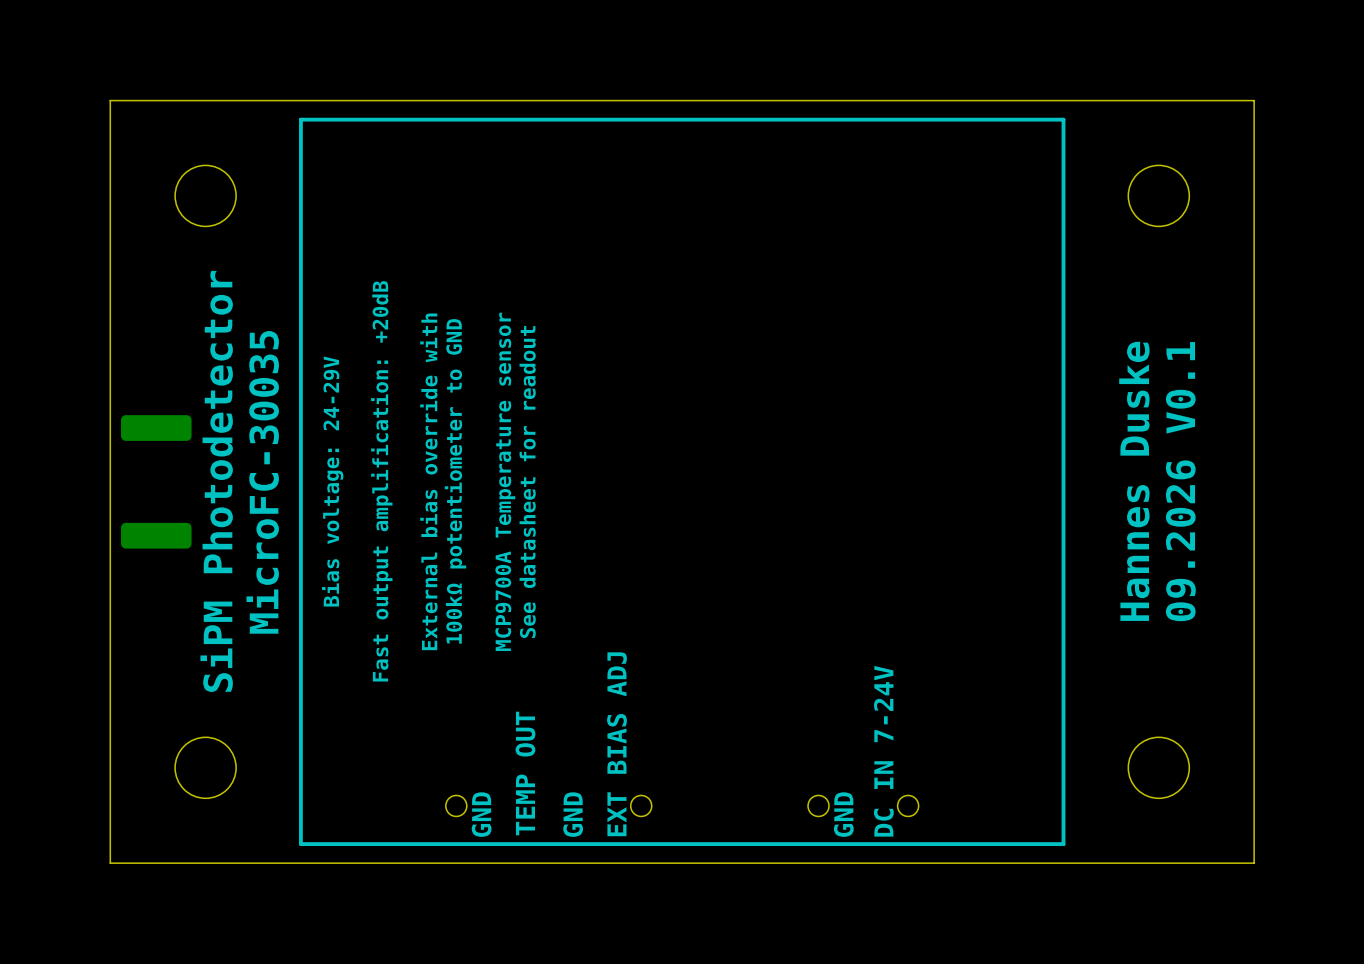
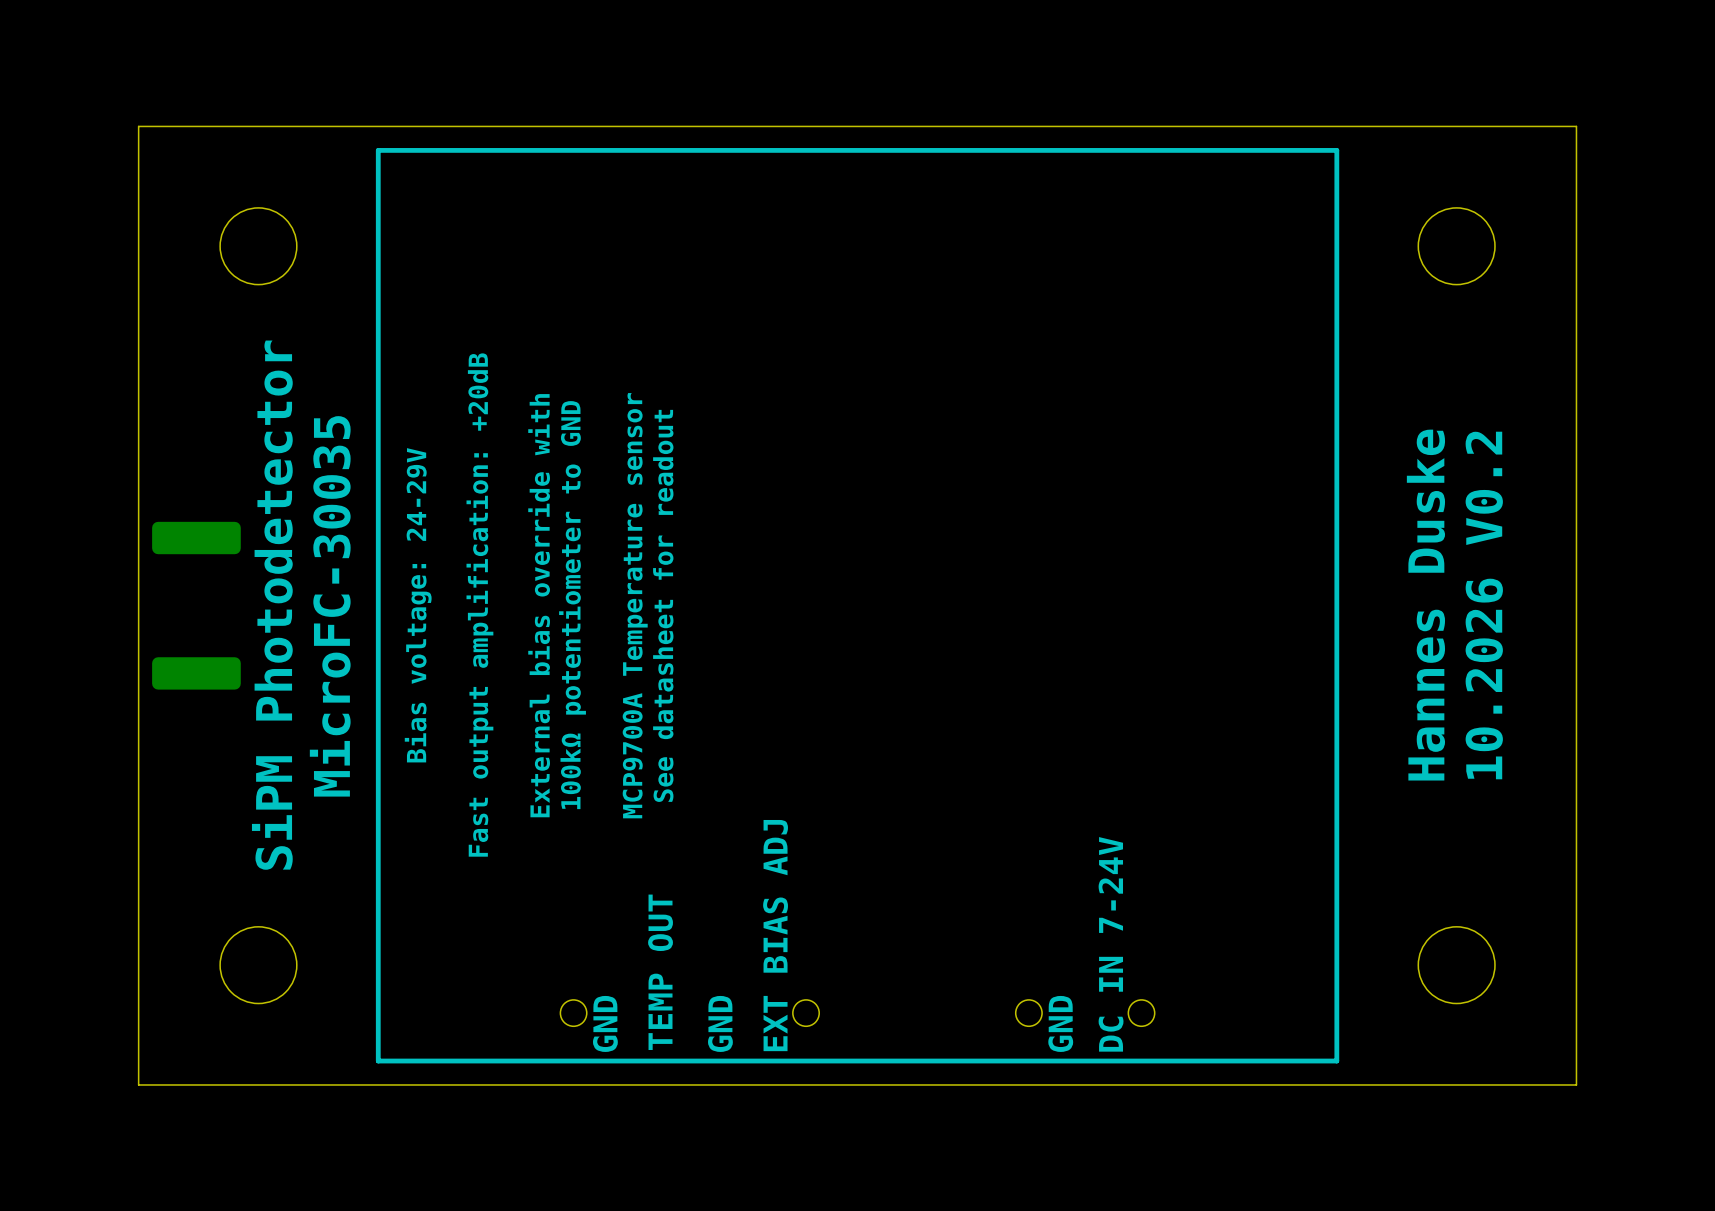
text: 09.2026 V0.1 (1180, 481) -> 10.2026 V0.2 (1484, 605)

